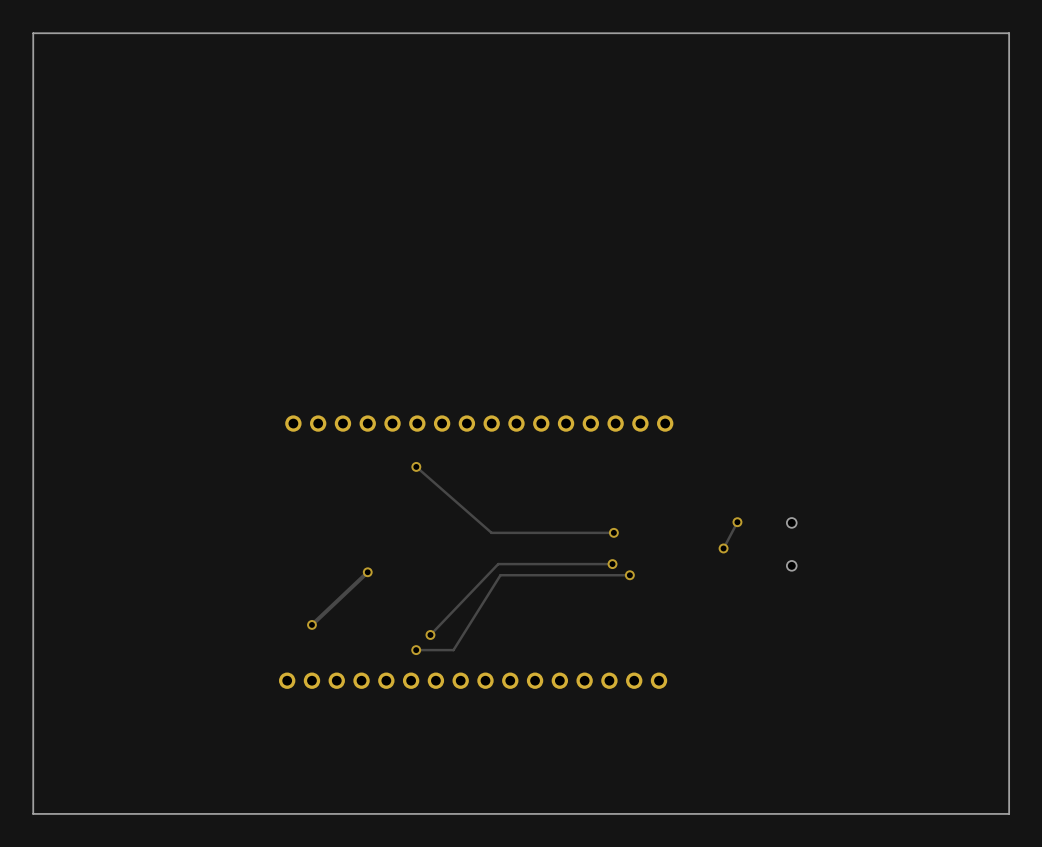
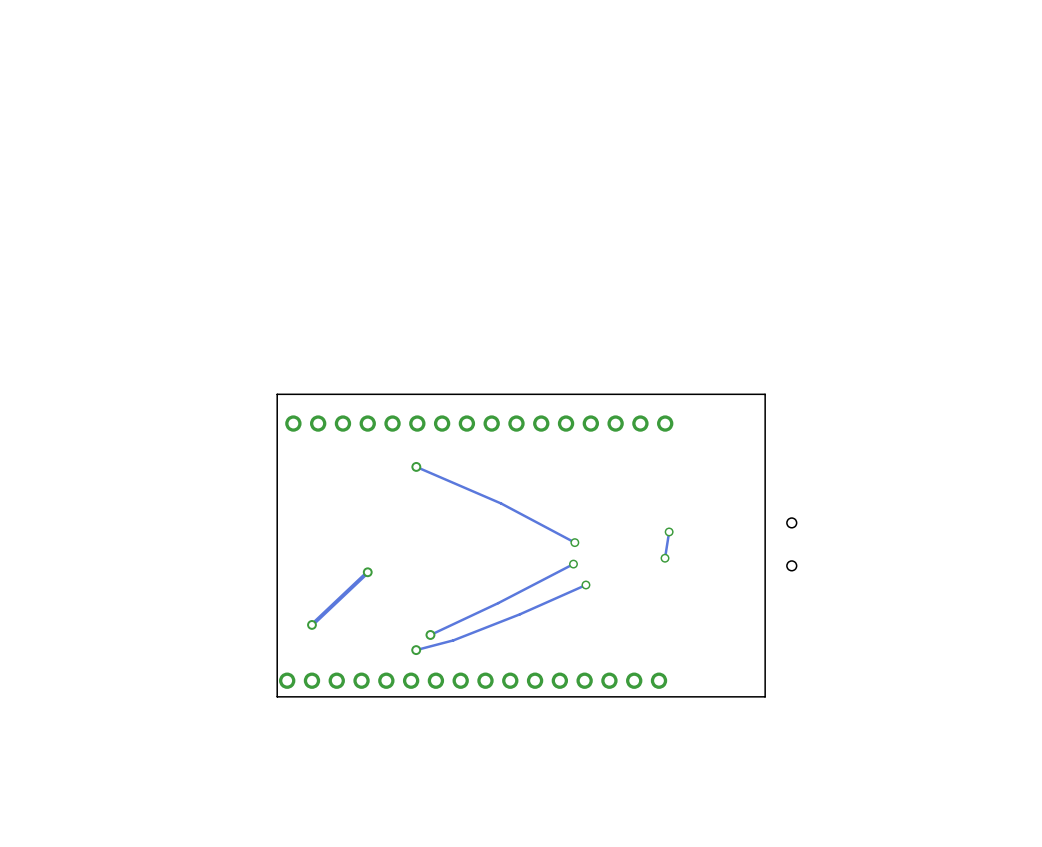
board edge: (1009, 33) (33, 33) (33, 813) (1009, 813) (1009, 33) -> none
board edge: none -> (765, 394) (277, 394) (277, 696) (765, 696) (765, 394)
track: (416, 466) (491, 532) (613, 532) -> (416, 466) (501, 503) (574, 542)
track: (737, 522) (723, 548) -> none
via: (737, 522) -> none
track: none -> (669, 531) (665, 558)
via: none -> (669, 531)
via: (613, 532) -> none
via: none -> (574, 542)
via: (723, 548) -> none
via: none -> (665, 558)
via: none -> (573, 564)
track: (612, 564) (498, 564) (430, 634) -> (573, 564) (498, 603) (430, 634)
via: (612, 564) -> none
track: (629, 575) (500, 575) (453, 650) (416, 650) -> (585, 585) (520, 614) (453, 640) (416, 650)
via: (629, 575) -> none
via: none -> (585, 585)

